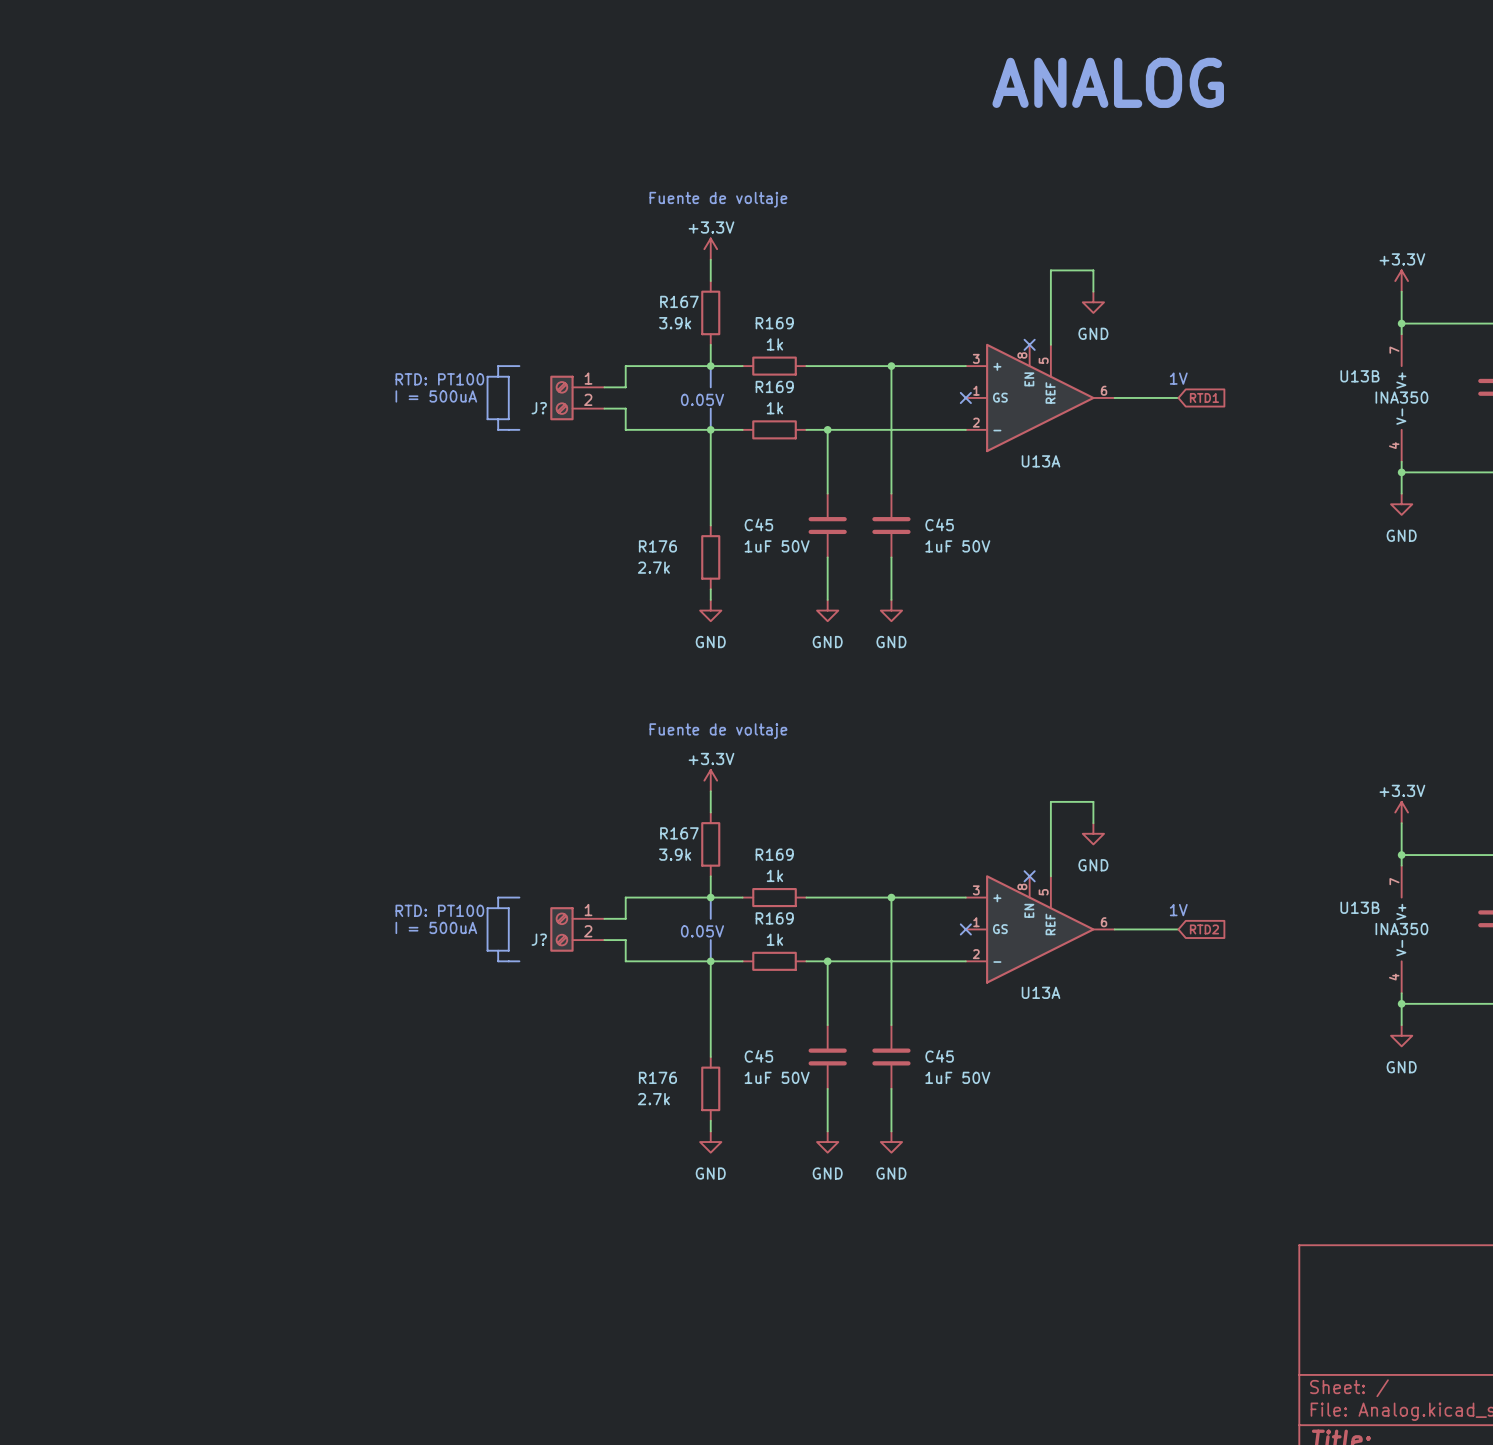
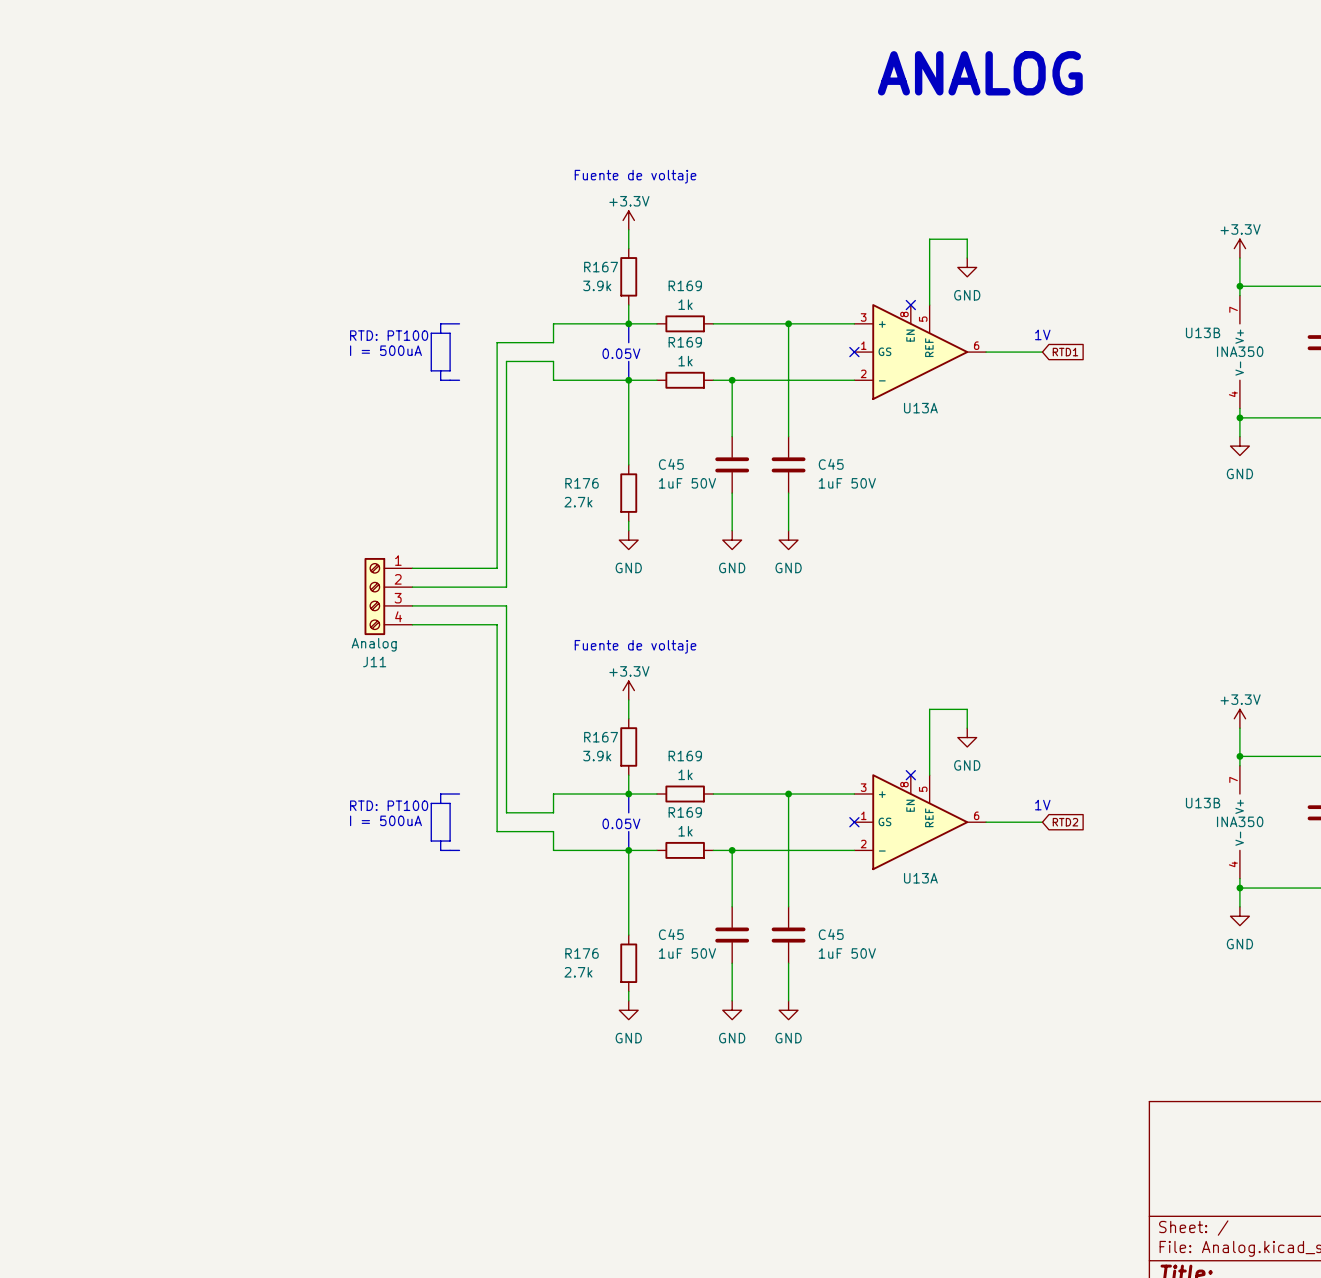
wire: none -> (534, 342) (497, 342) (497, 568) (412, 568)
J?: (577, 397) -> none
wire: none -> (534, 361) (506, 361) (506, 587) (412, 587)
J11: none -> Analog (388, 596)
wire: none -> (412, 605) (506, 605) (506, 812) (534, 812)
wire: none -> (412, 624) (497, 624) (497, 831) (534, 831)
J?: (577, 929) -> none

